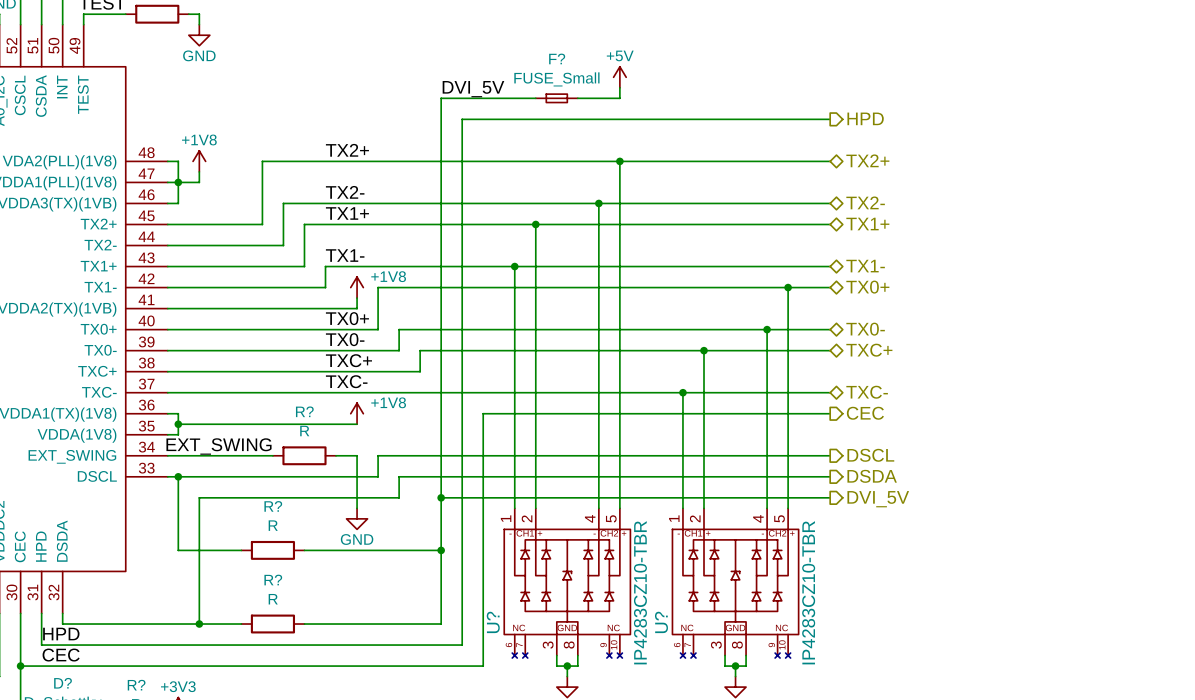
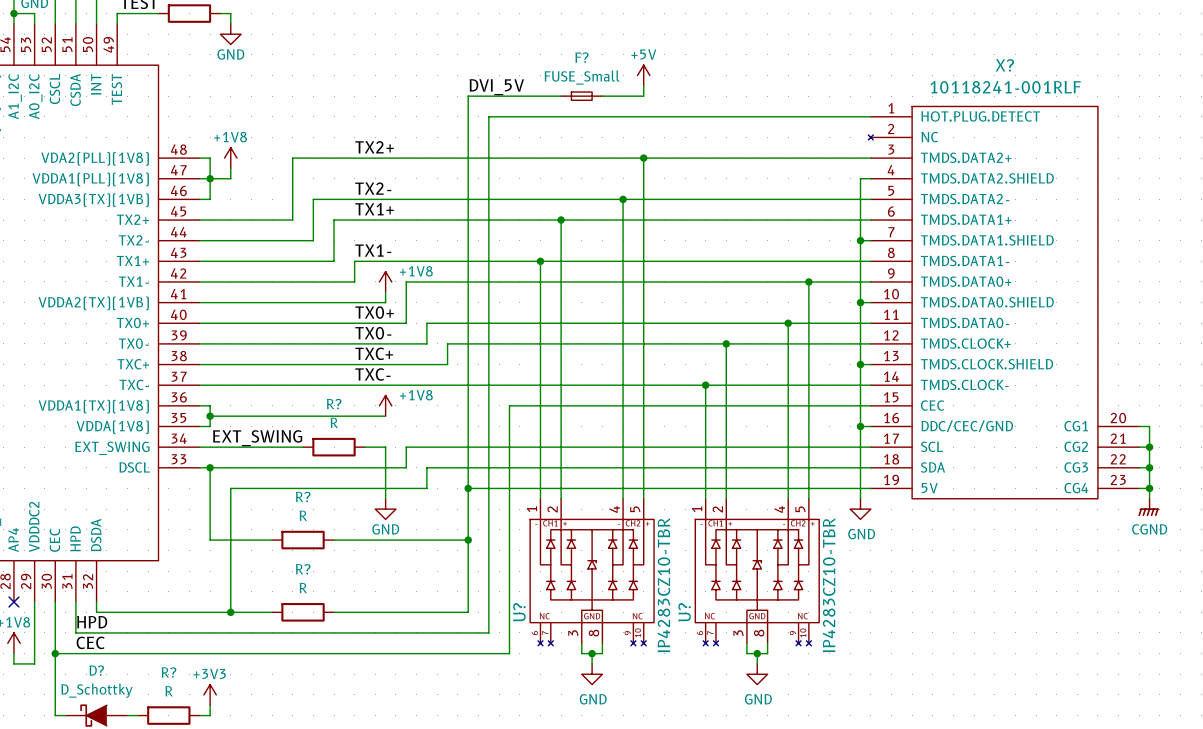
hierarchical label: HPD (865, 118) -> none
wire: none -> (850, 116) (870, 116)
hierarchical label: TX2+ (867, 160) -> none
wire: none -> (850, 158) (870, 158)
wire: none -> (870, 178) (860, 178) (860, 498)
hierarchical label: TX2- (865, 202) -> none
wire: none -> (850, 199) (870, 199)
wire: none -> (850, 220) (870, 220)
hierarchical label: TX1+ (867, 224) -> none
wire: none -> (860, 240) (870, 240)
junction: none -> (860, 240)
wire: none -> (850, 261) (870, 261)
hierarchical label: TX1- (865, 266) -> none
wire: none -> (850, 281) (870, 281)
hierarchical label: TX0+ (867, 287) -> none
wire: none -> (860, 302) (870, 302)
junction: none -> (860, 302)
X?: none -> 10118241-001RLF (1003, 302)
wire: none -> (850, 323) (870, 323)
hierarchical label: TX0- (865, 329) -> none
wire: none -> (850, 343) (870, 343)
hierarchical label: TXC+ (869, 350) -> none
wire: none -> (860, 364) (870, 364)
junction: none -> (860, 364)
wire: none -> (850, 385) (870, 385)
hierarchical label: TXC- (867, 392) -> none
wire: none -> (850, 405) (870, 405)
hierarchical label: CEC (865, 413) -> none
wire: none -> (860, 426) (870, 426)
junction: none -> (860, 426)
wire: none -> (1139, 426) (1149, 426) (1149, 498)
wire: none -> (850, 447) (870, 447)
hierarchical label: DSCL (870, 455) -> none
wire: none -> (1139, 447) (1149, 447)
junction: none -> (1149, 447)
wire: none -> (850, 467) (870, 467)
hierarchical label: DSDA (872, 476) -> none
wire: none -> (1139, 467) (1149, 467)
junction: none -> (1149, 467)
wire: none -> (850, 488) (870, 488)
wire: none -> (1139, 488) (1149, 488)
junction: none -> (1149, 488)
hierarchical label: DVI_5V (878, 499) -> none
power symbol: none -> CGND (1148, 507)
power symbol: none -> GND (860, 509)

